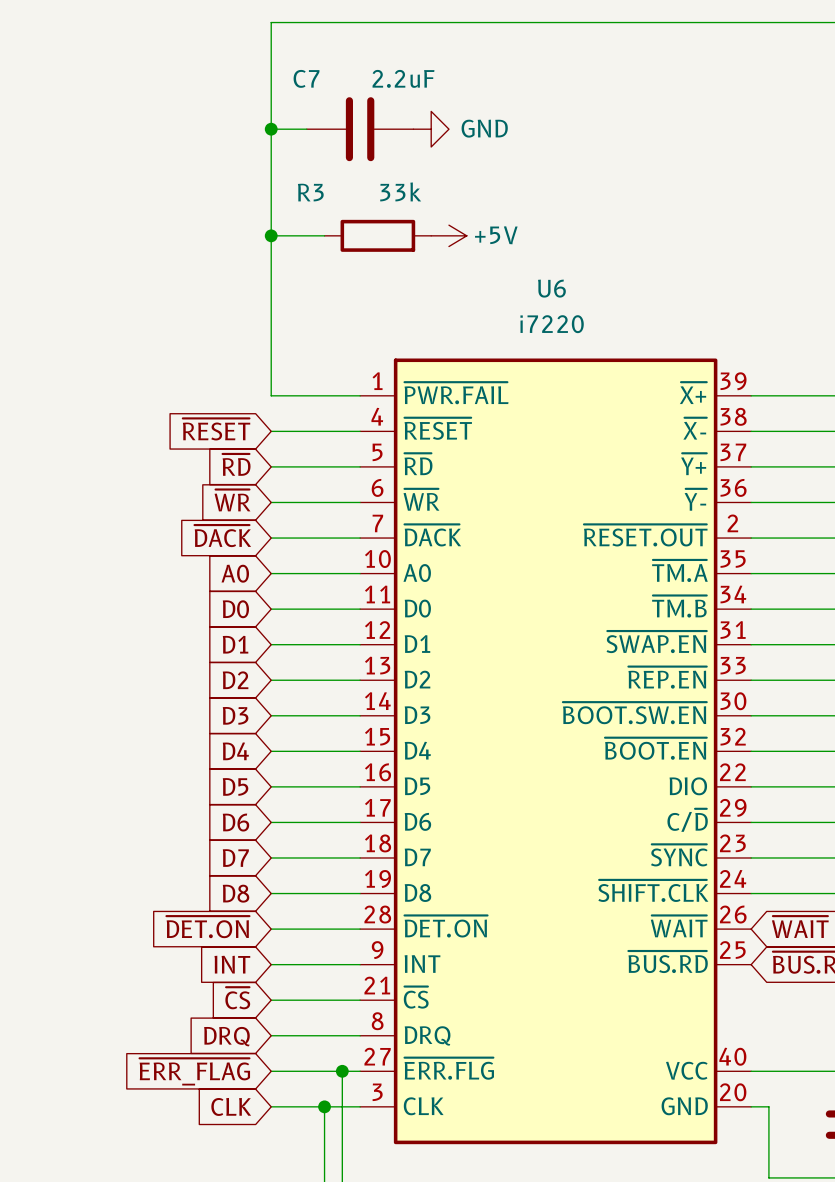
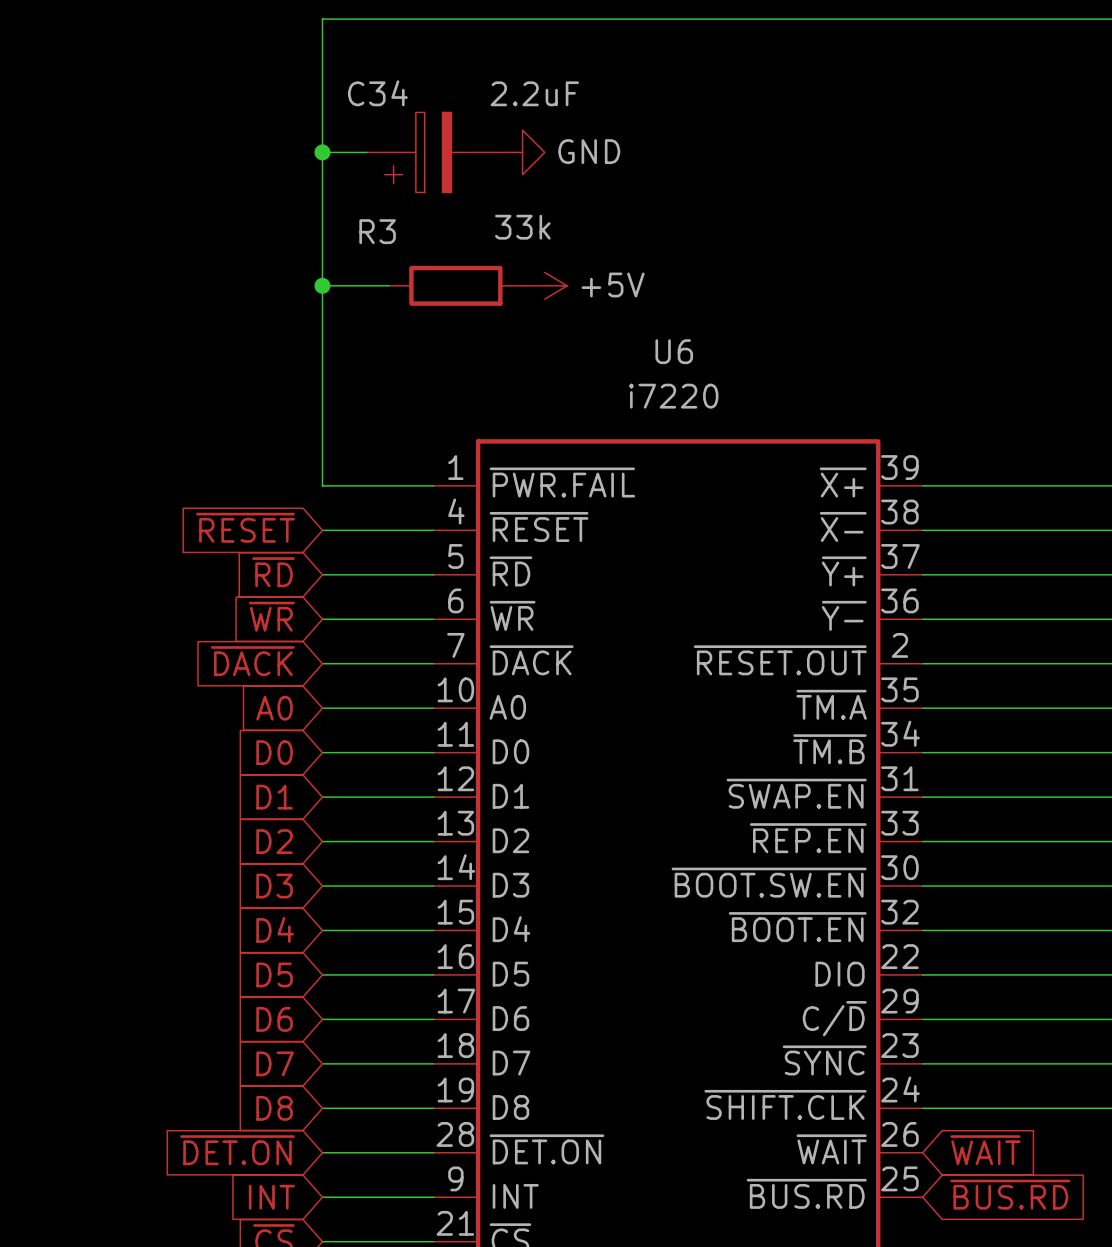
C7: 2.2uF (360, 129) -> none
C34: none -> 2.2uF (433, 152)
R3 value position: 33k (400, 191) -> 33k (522, 227)

